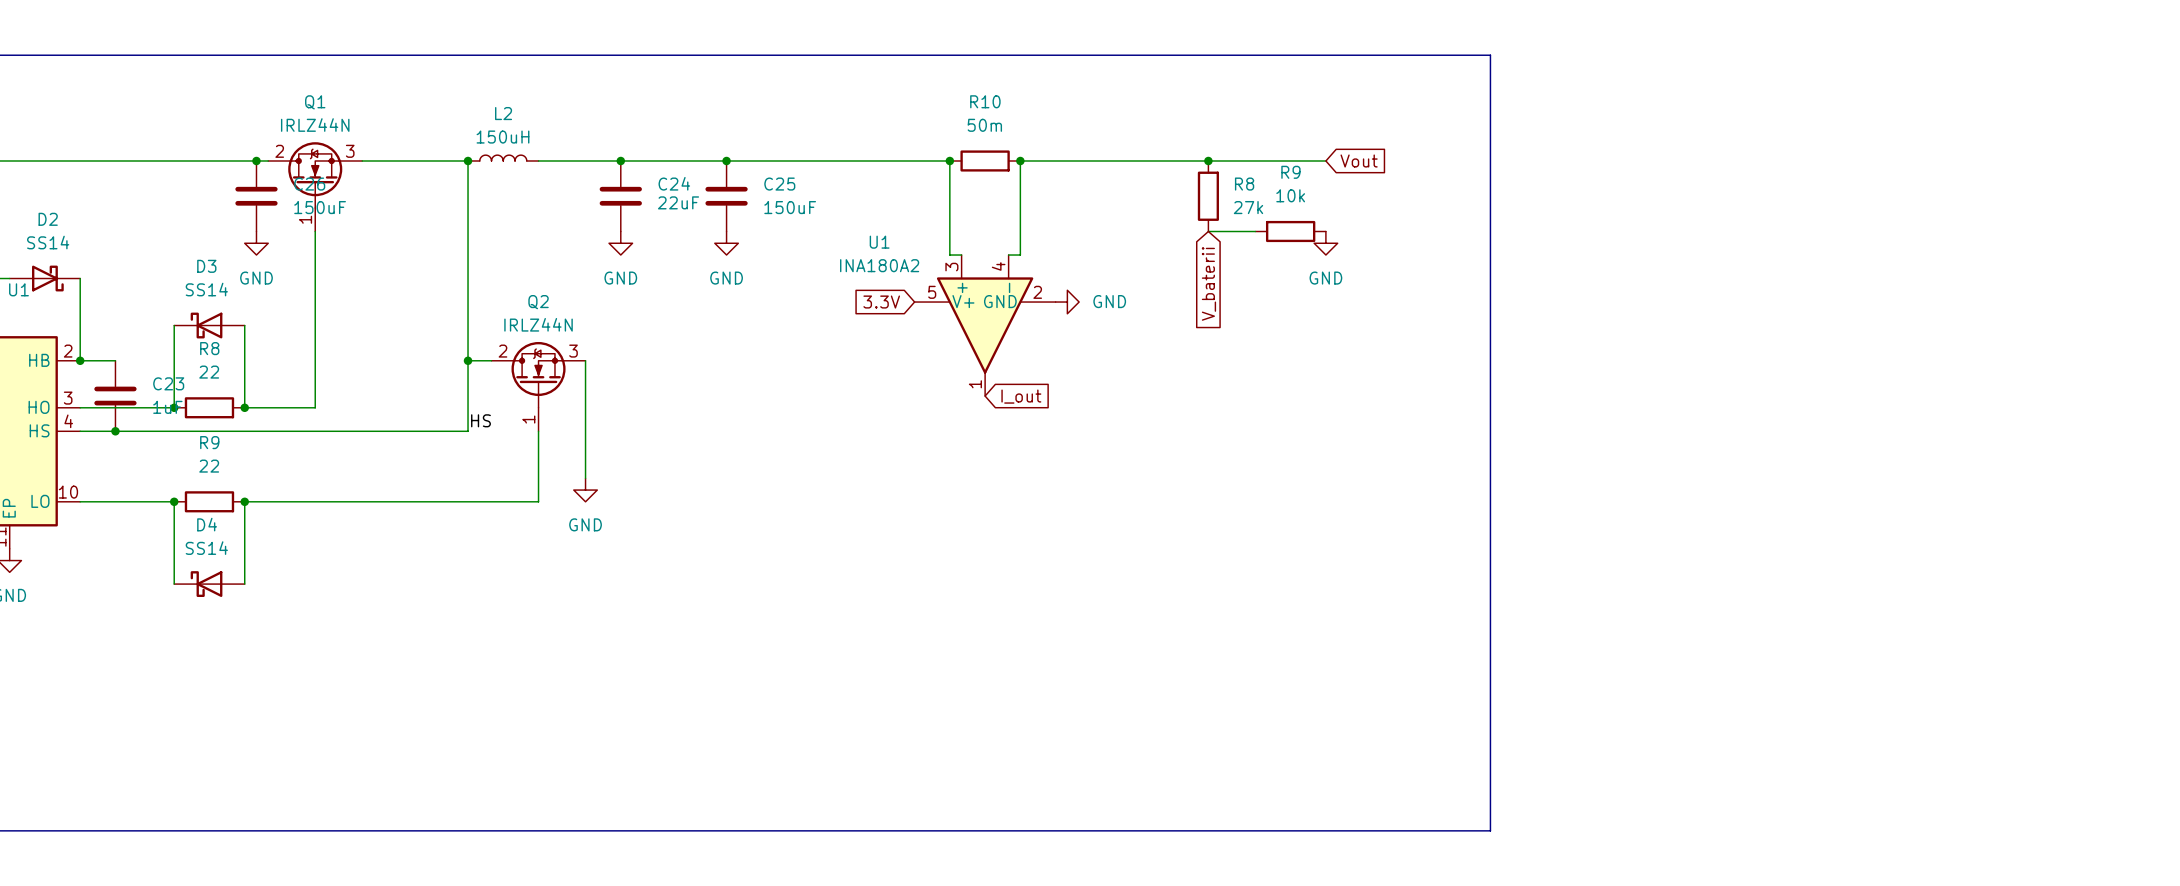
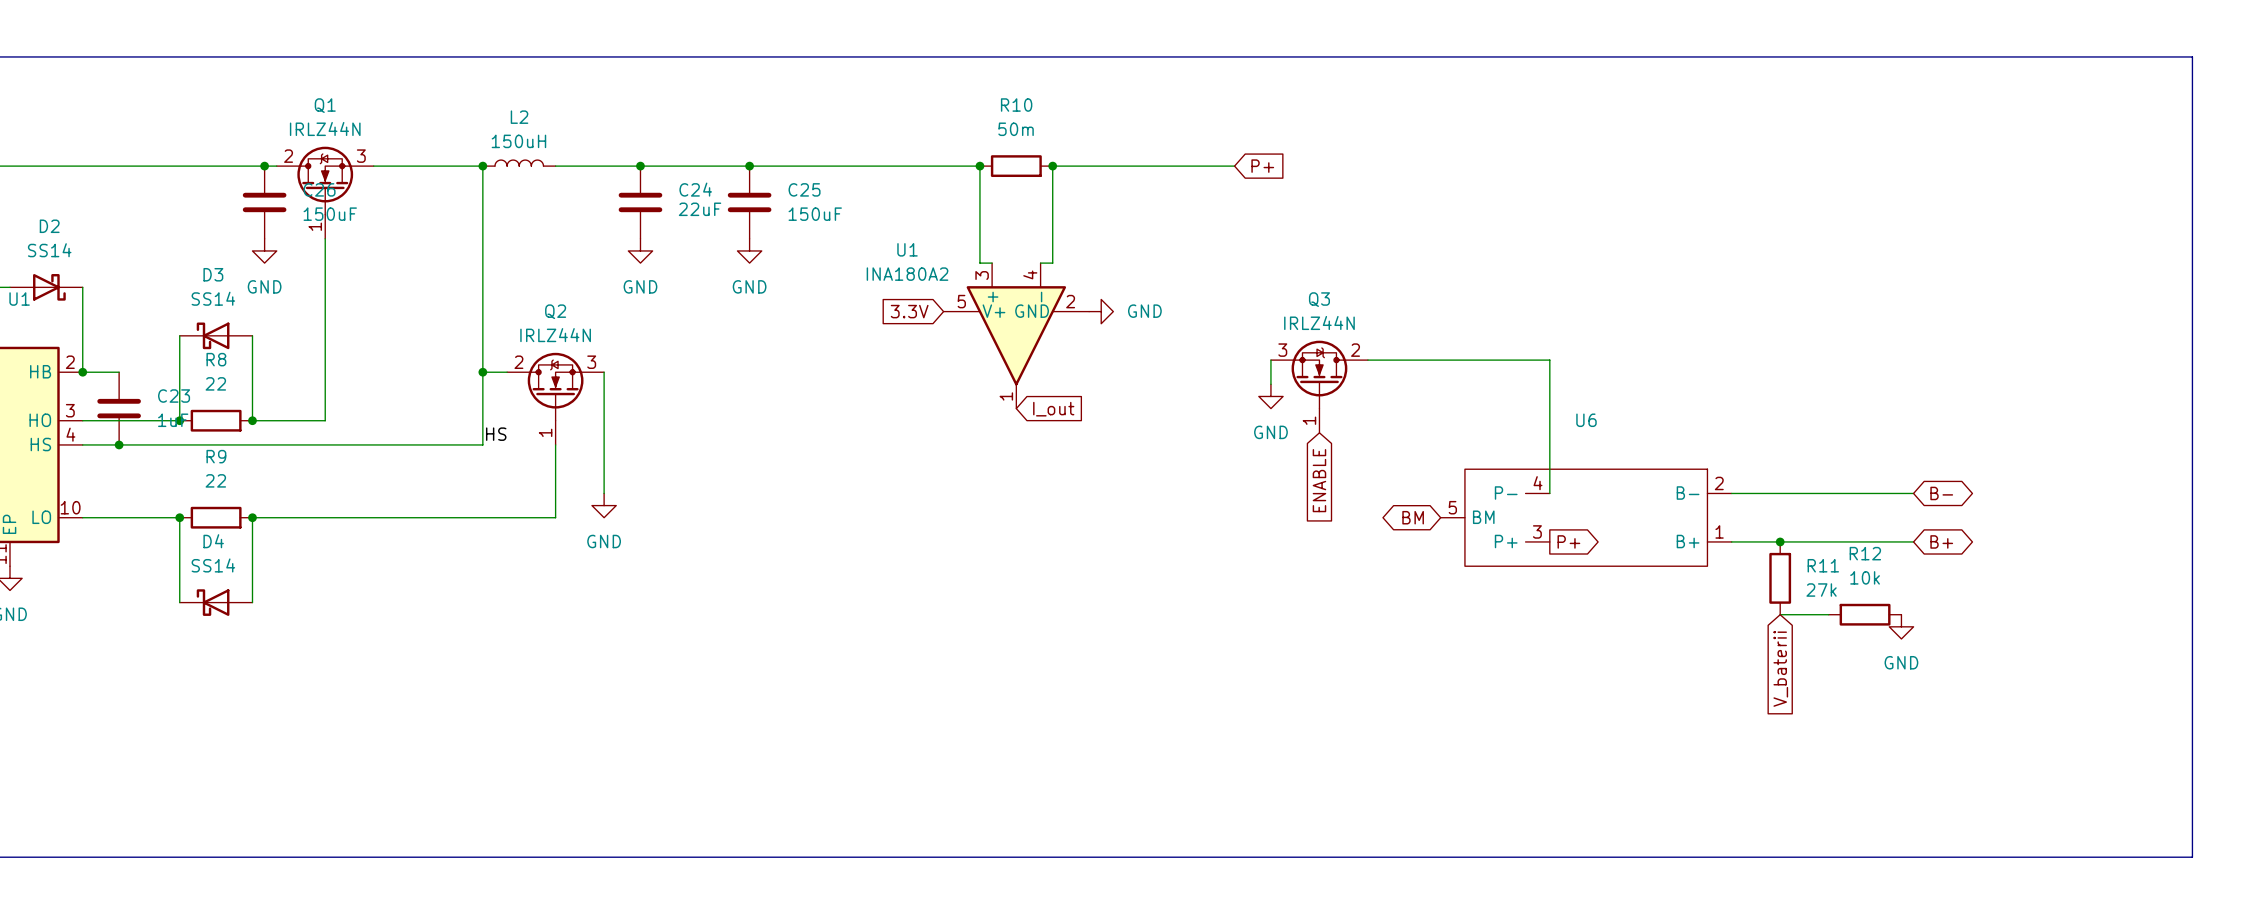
line: (1490, 55) (1490, 830) -> (1537, 56) (2192, 56) (2192, 857) (1537, 857)
wire: (1196, 160) (1325, 160) -> none
junction: (1208, 160) -> none
global label: none -> P+ (1262, 166)
global label: Vout (1359, 160) -> none
R8: 27k (1208, 196) -> none
wire: (1208, 231) (1255, 231) -> none
R9: 10k (1290, 231) -> none
power symbol position: GND (1325, 243) -> GND (1270, 396)
global label: V_baterii (1208, 283) -> none
wire: none -> (1270, 360) (1270, 384)
wire: none -> (1367, 360) (1549, 360) (1549, 493)
Q3: none -> IRLZ44N (1319, 386)
global label: none -> ENABLE (1319, 480)
wire: none -> (1731, 493) (1913, 493)
global label: none -> B- (1941, 493)
global label: none -> BM (1413, 517)
U6: none -> (1586, 517)
global label: none -> P+ (1568, 541)
wire: none -> (1731, 541) (1913, 541)
junction: none -> (1780, 541)
global label: none -> B+ (1941, 541)
R11: none -> 27k (1780, 578)
wire: none -> (1780, 614) (1828, 614)
R12: none -> 10k (1865, 614)
power symbol: none -> GND (1901, 626)
global label: none -> V_baterii (1780, 668)

